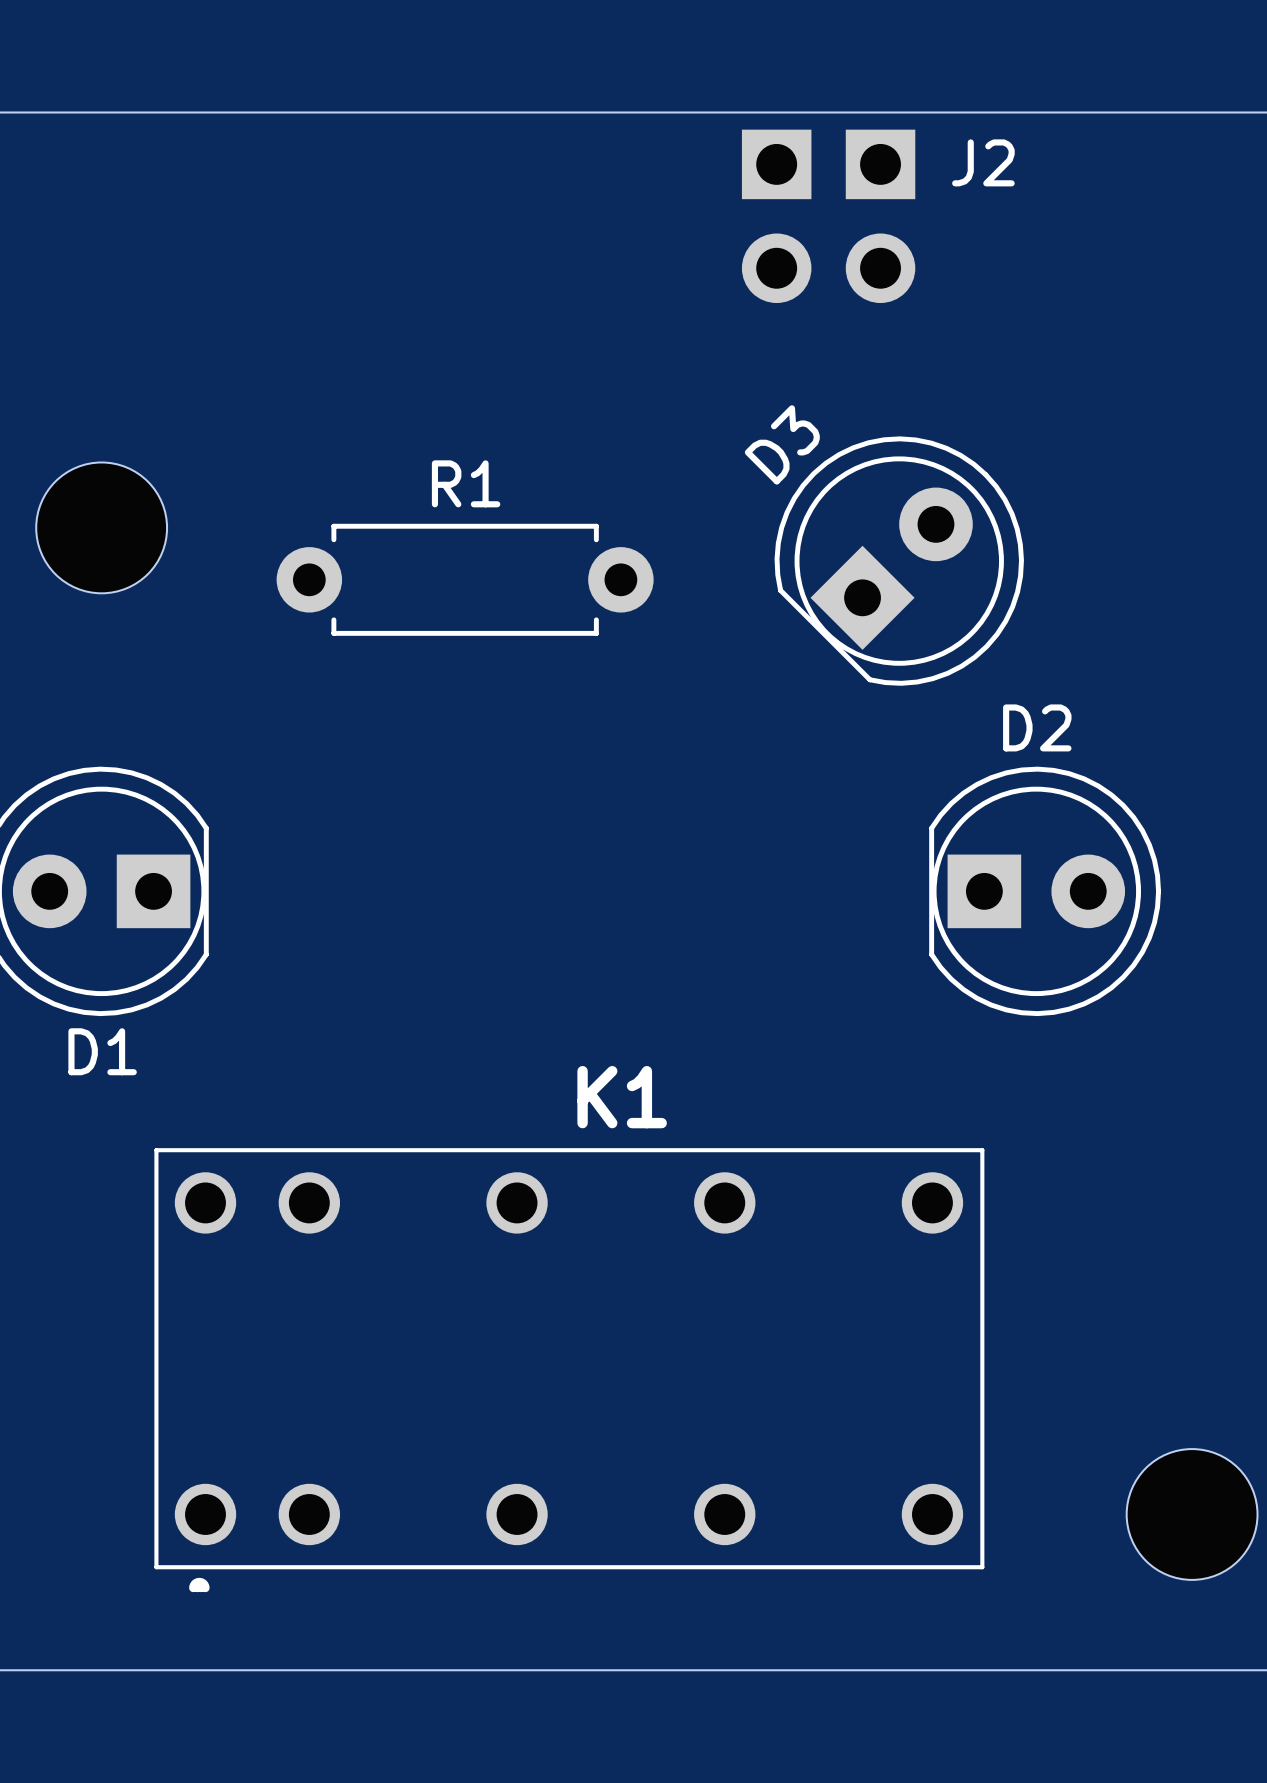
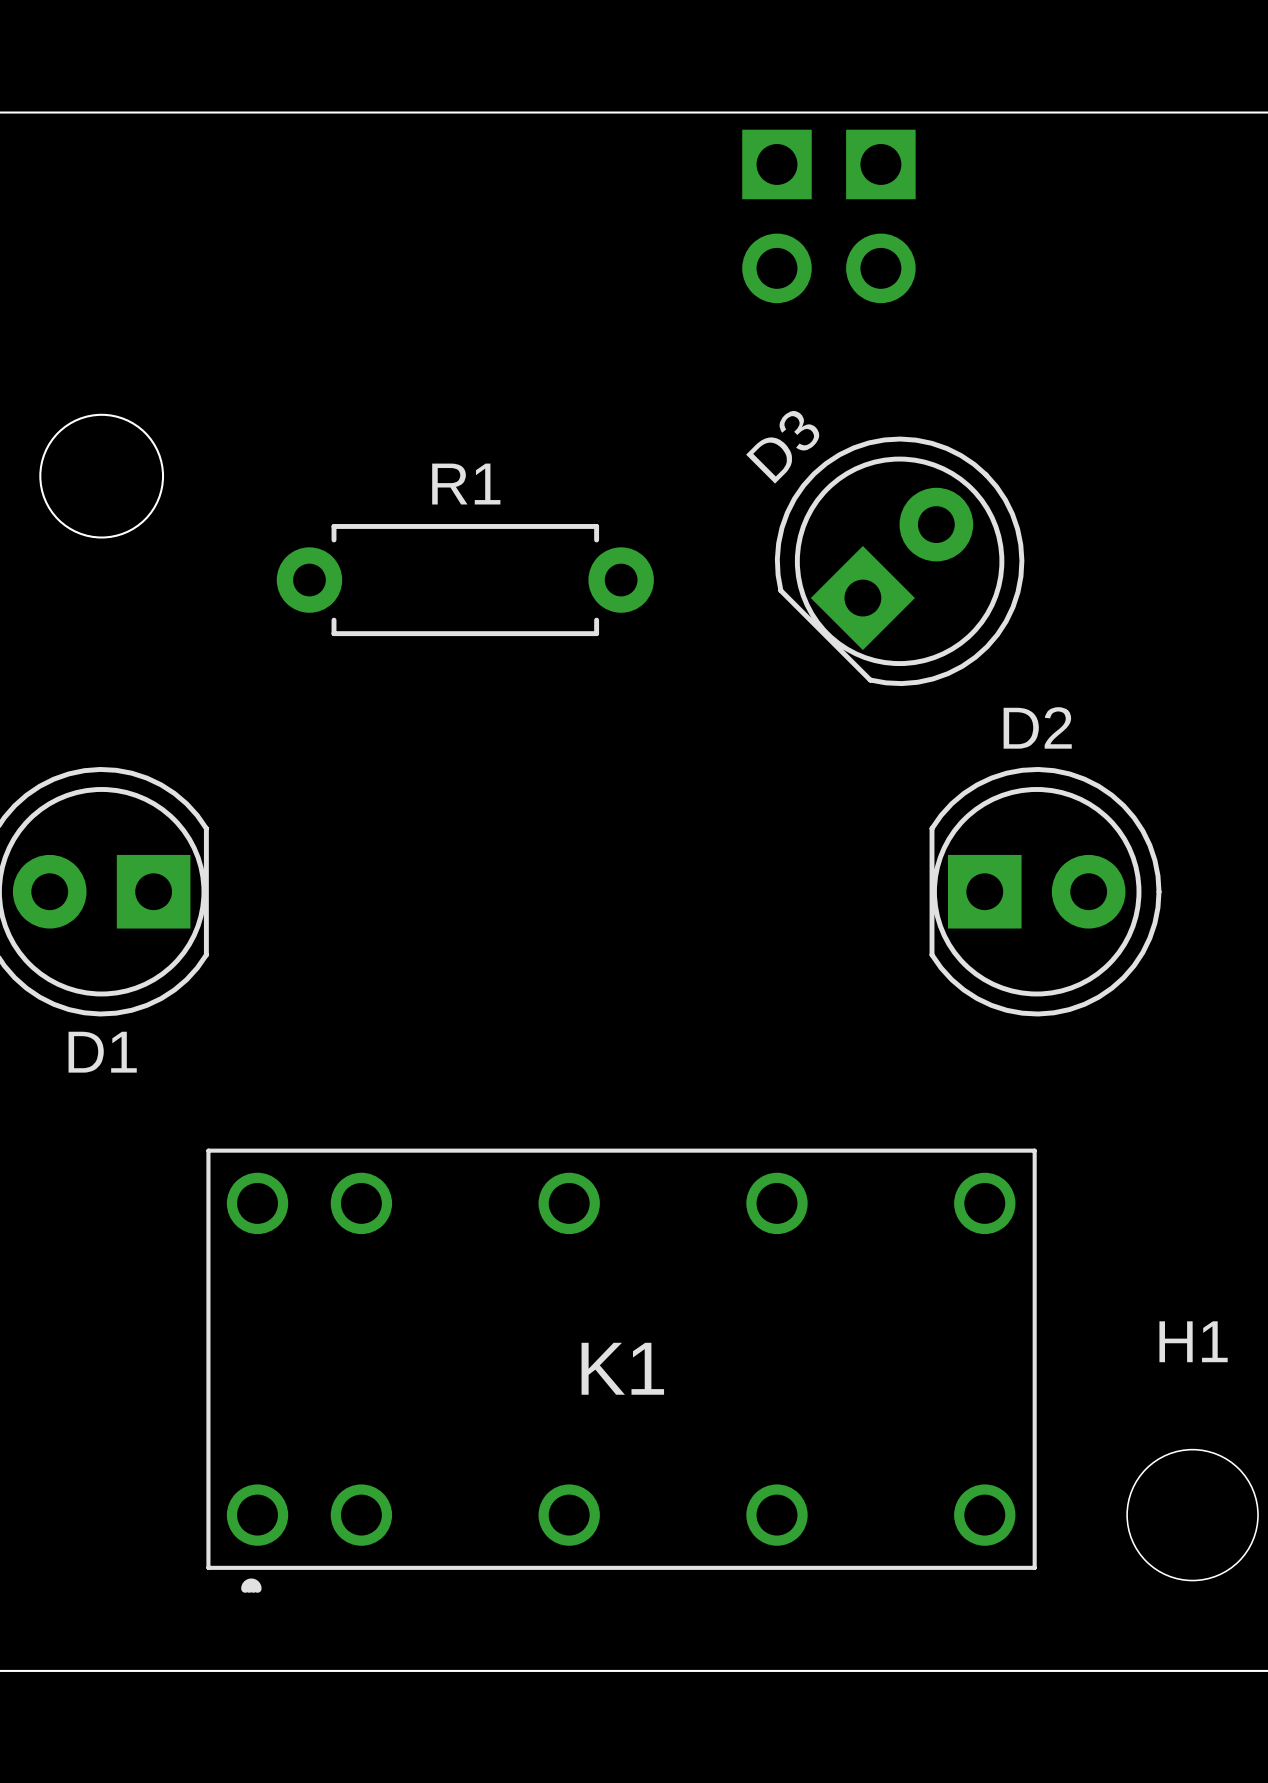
J2 name: J2 (983, 162) -> none
round board edge: none -> [39, 413, 165, 539]
part: (101, 527) -> none
K1 name position: K1 (622, 1097) -> K1 (622, 1368)
H1 name: none -> H1 (1193, 1341)
K1 position: (569, 1370) -> (621, 1370)

